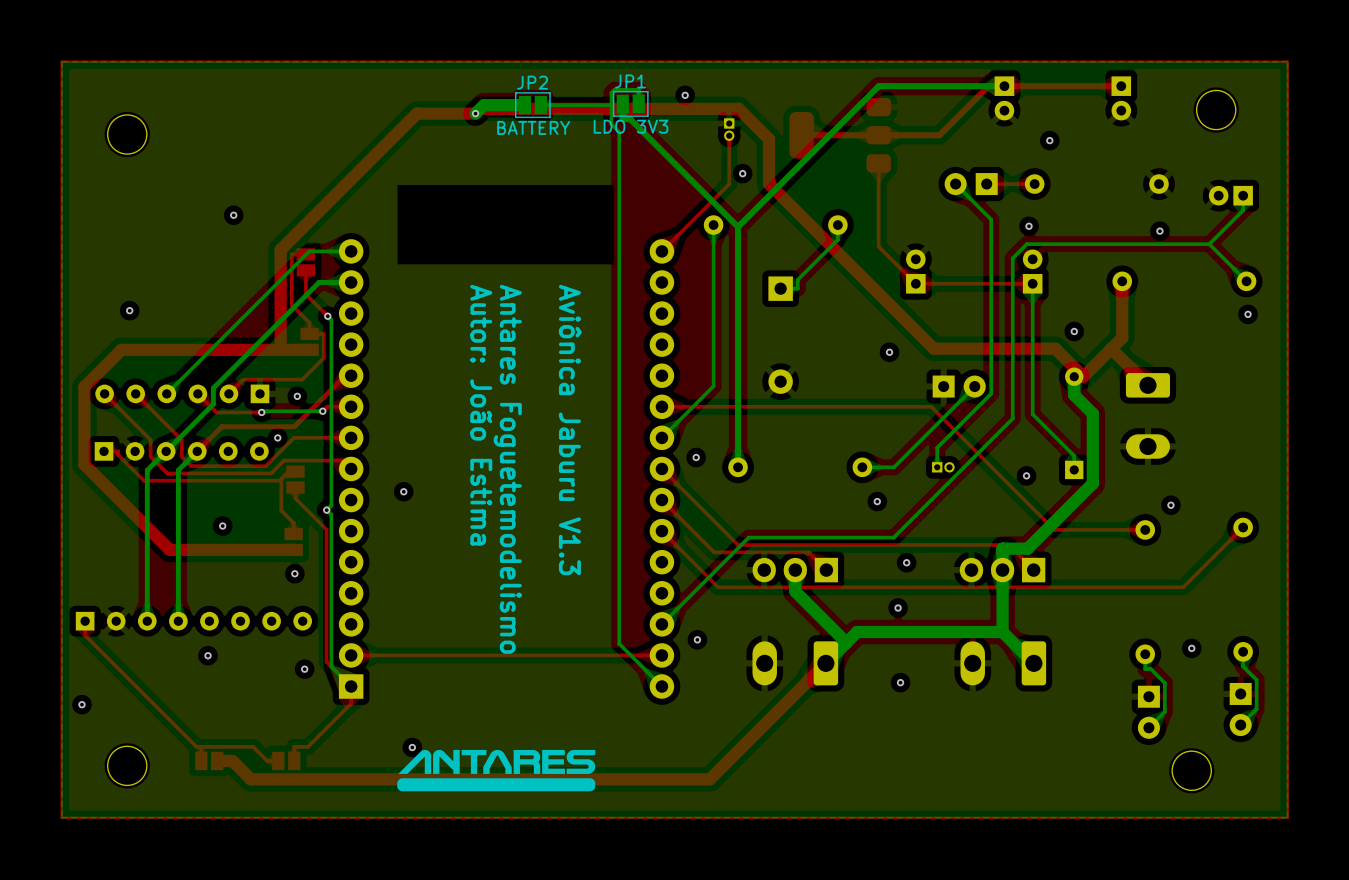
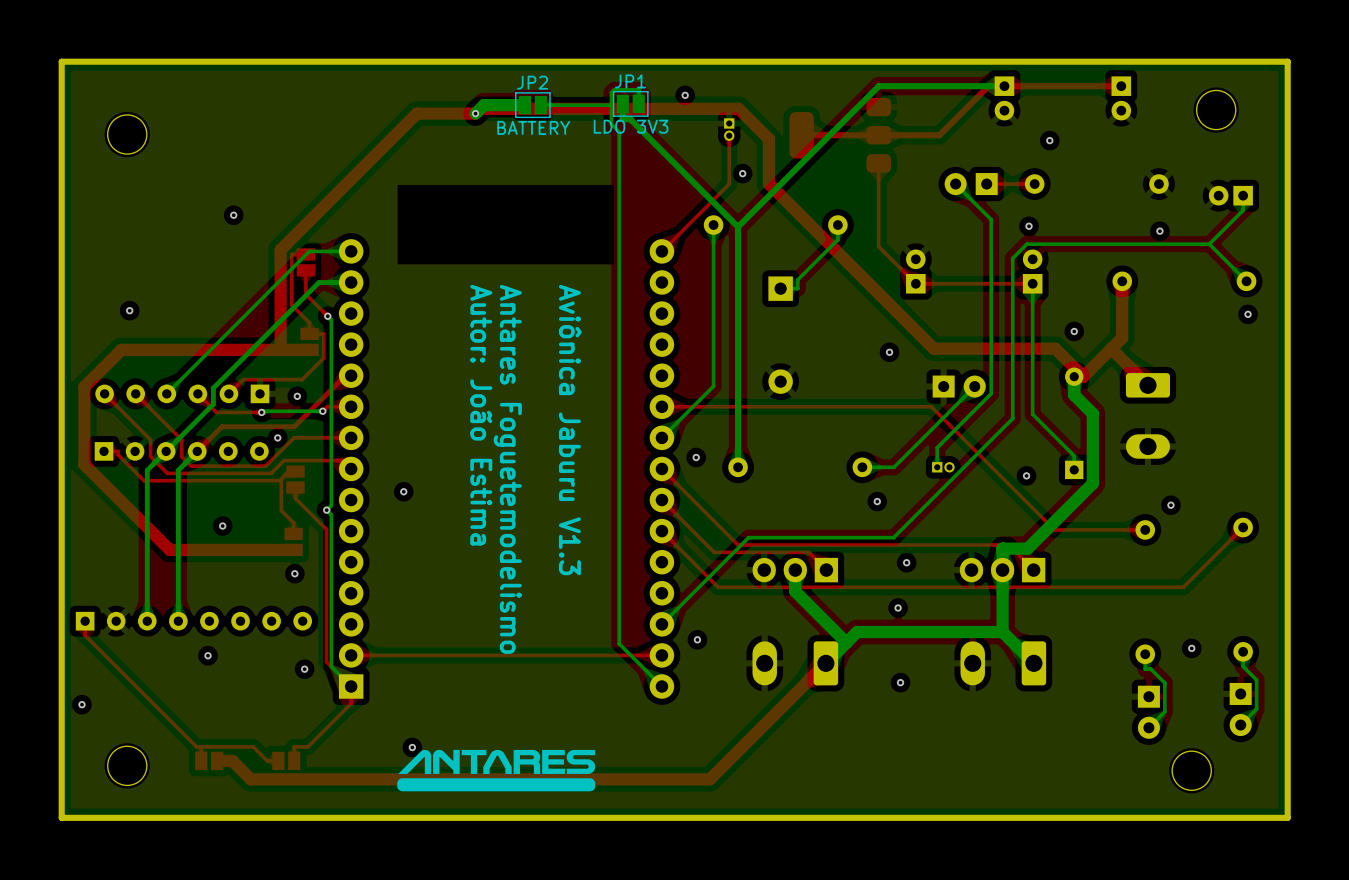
board edge: none -> (1287, 61) (61, 61) (61, 817) (1287, 817) (1287, 61)

